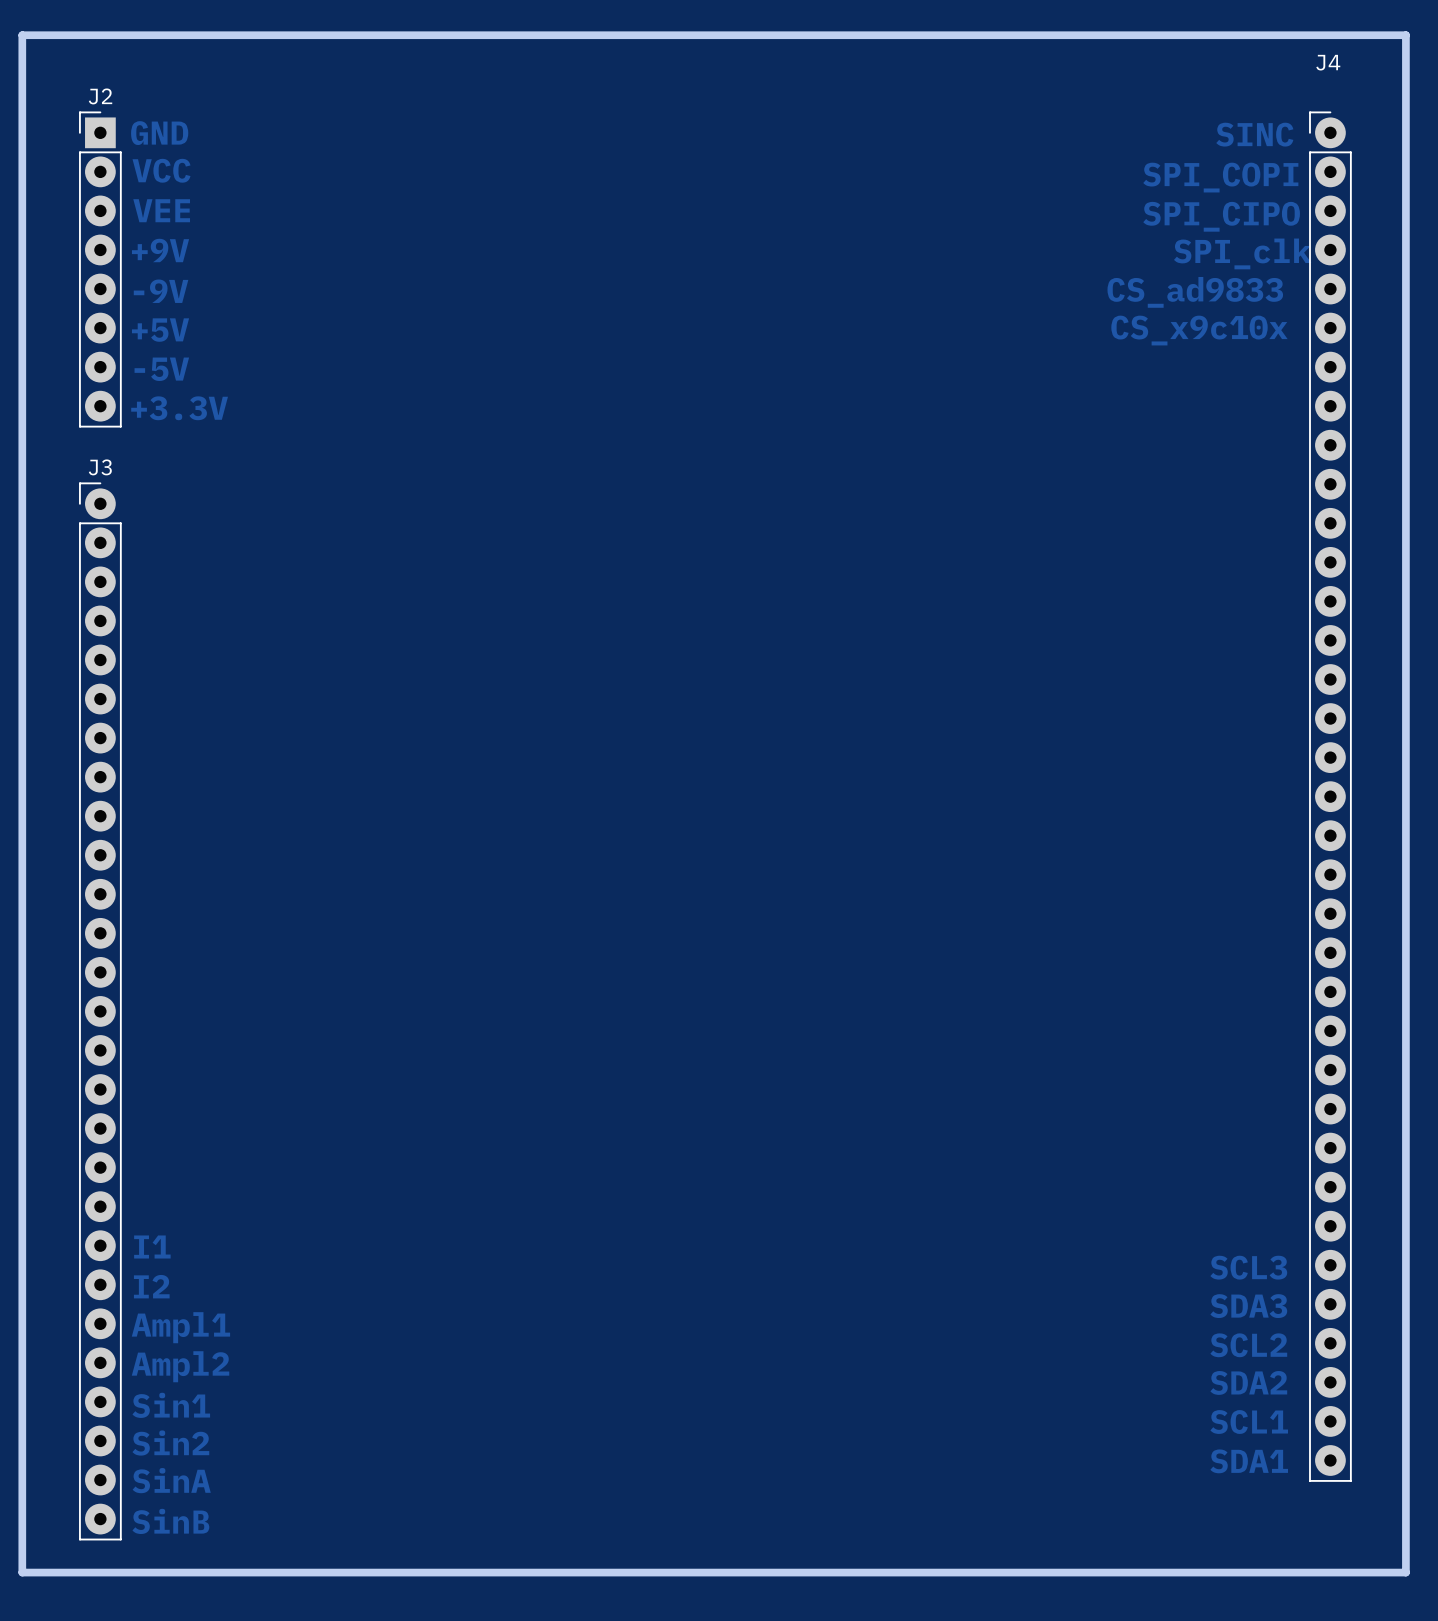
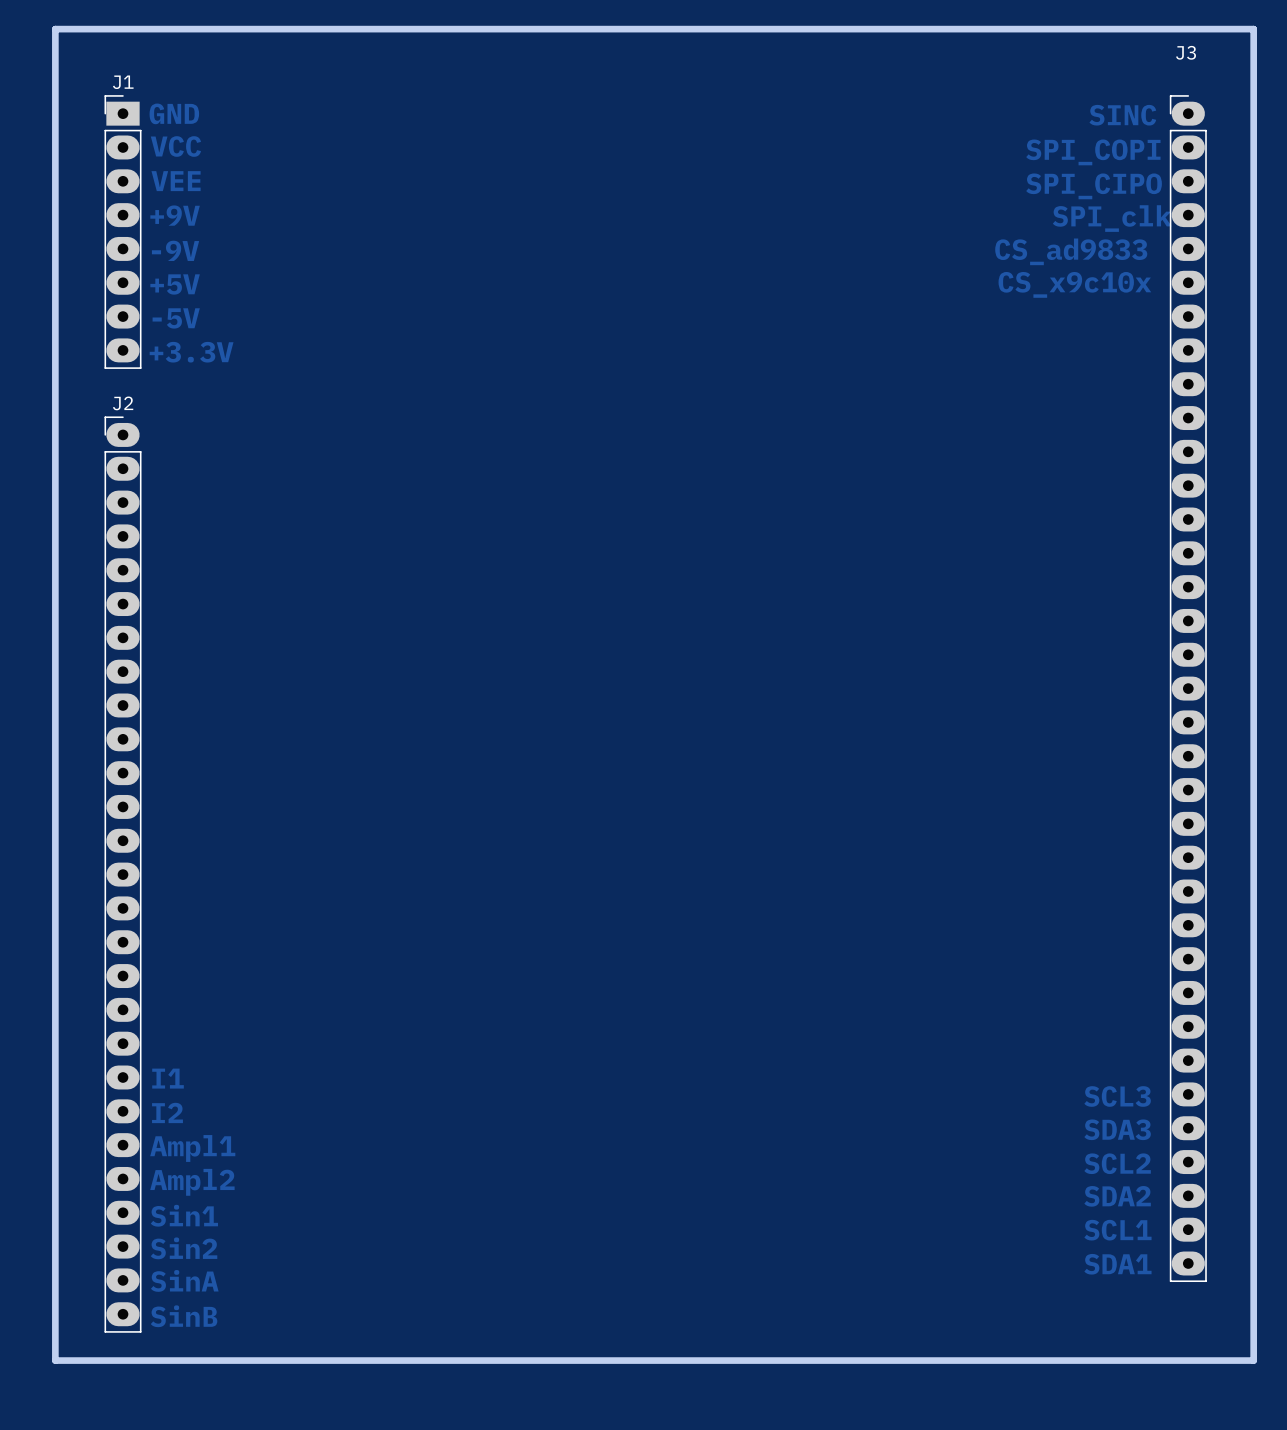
J2 name position: J2 (100, 96) -> J2 (123, 403)
J2 footprint: [79, 111, 122, 428] -> [104, 416, 142, 1333]
J1: none -> (123, 232)
J3 name position: J3 (100, 467) -> J3 (1186, 52)
J3 footprint: [79, 482, 122, 1541] -> [1169, 95, 1207, 1283]
J4: (1330, 796) -> none

